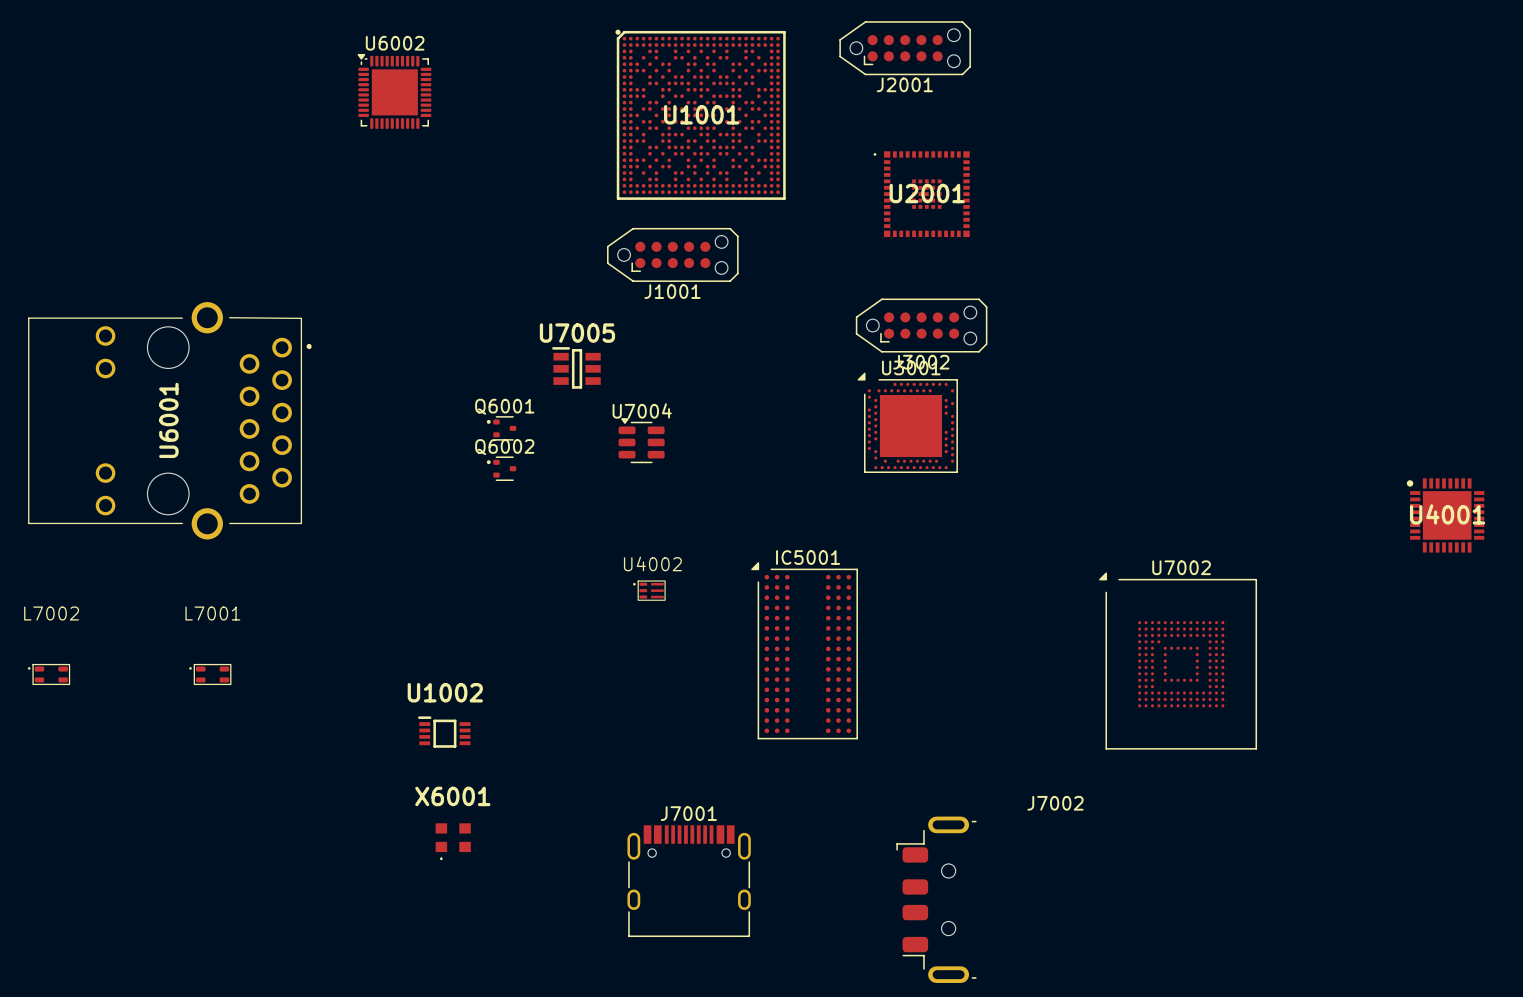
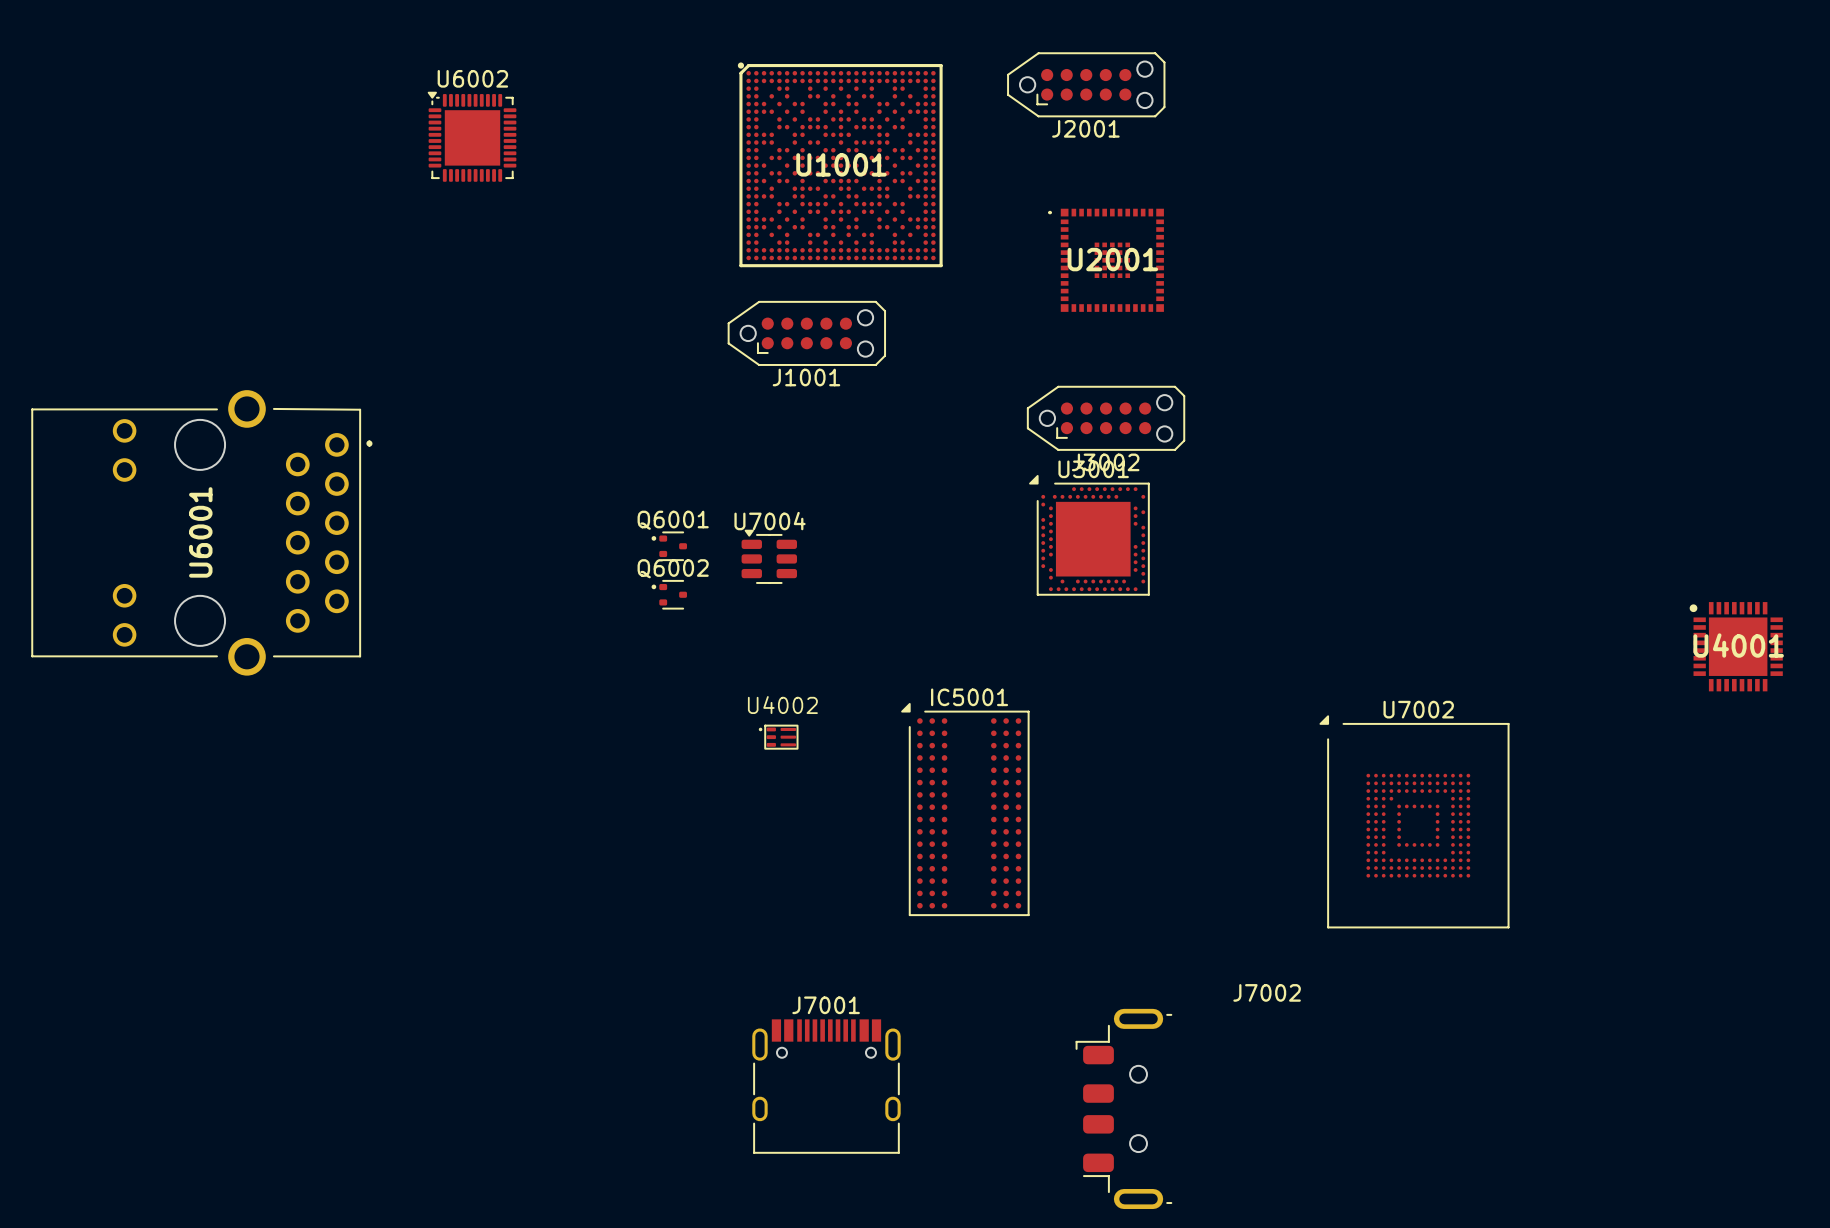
U7005: (576, 367) -> none
Q6001 position: (501, 428) -> (669, 546)
Q6002 position: (501, 468) -> (669, 594)
L7002: (49, 674) -> none
L7001: (210, 674) -> none
U1002: (444, 732) -> none
X6001: (453, 841) -> none

